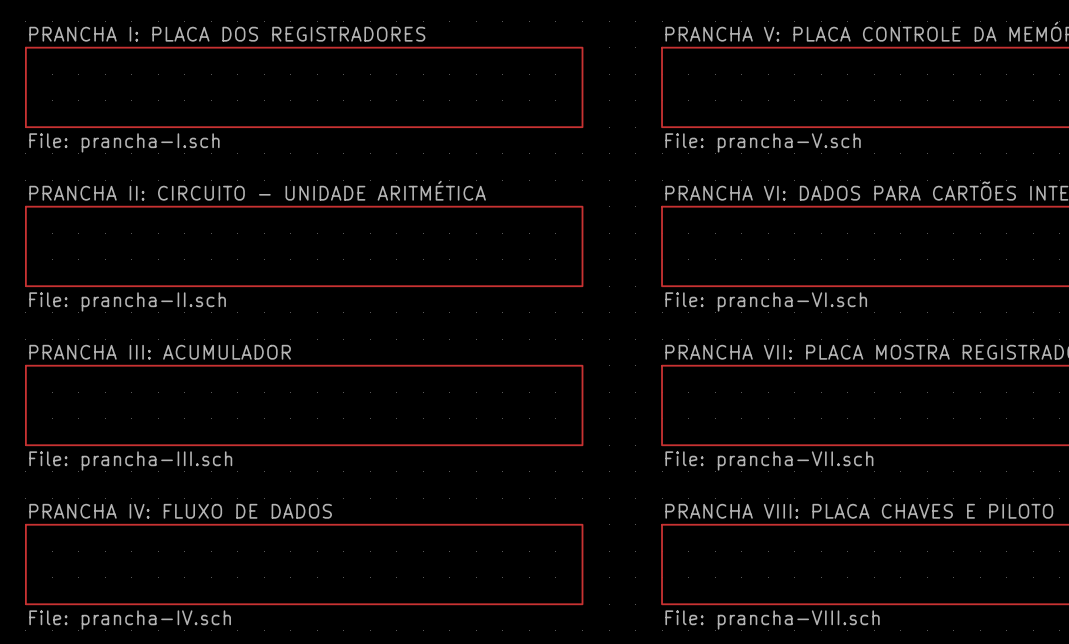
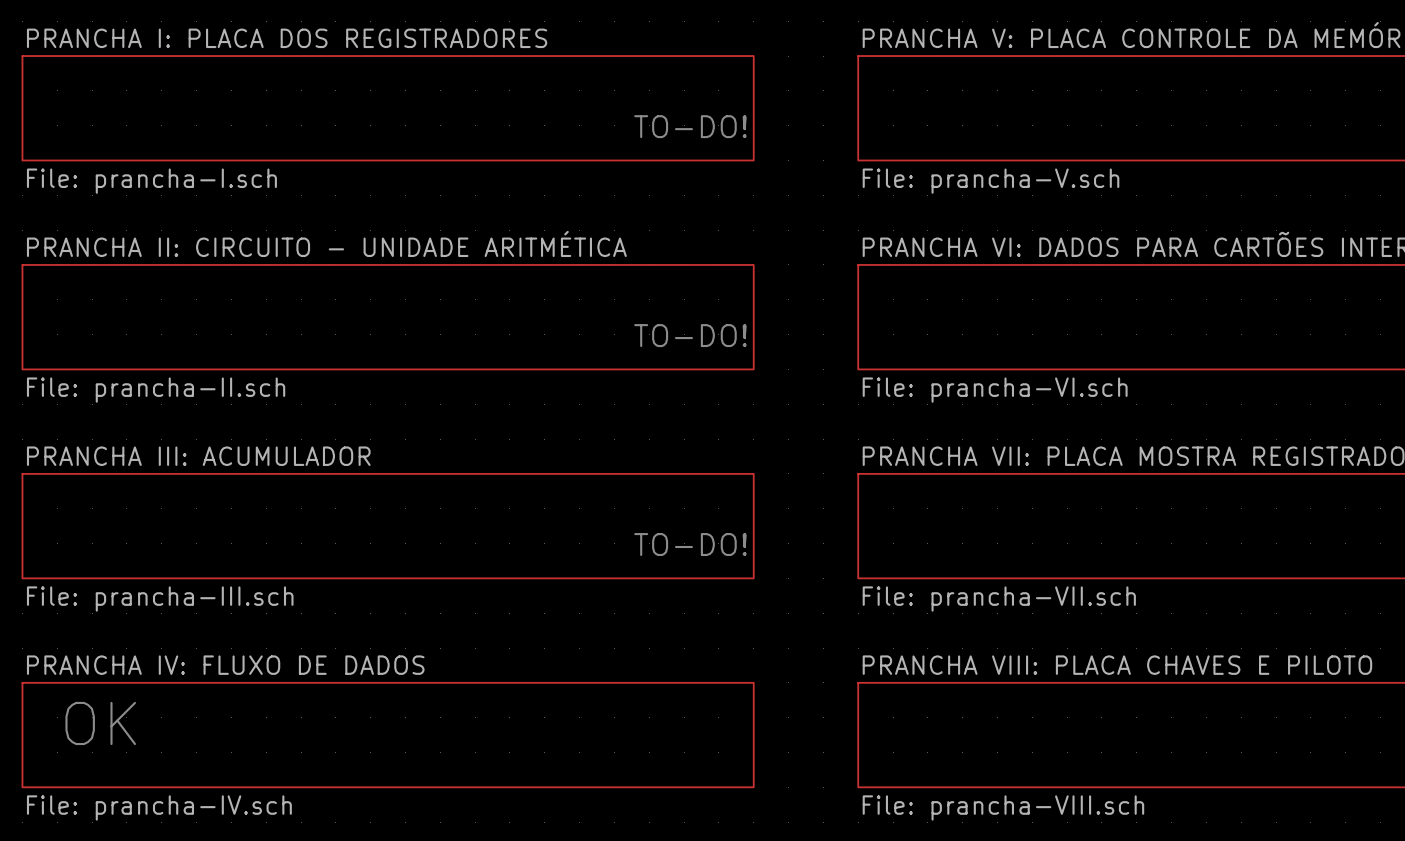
text: none -> TO-DO! (690, 126)
text: none -> TO-DO! (690, 335)
text: none -> TO-DO! (690, 544)
text: none -> OK (100, 723)

